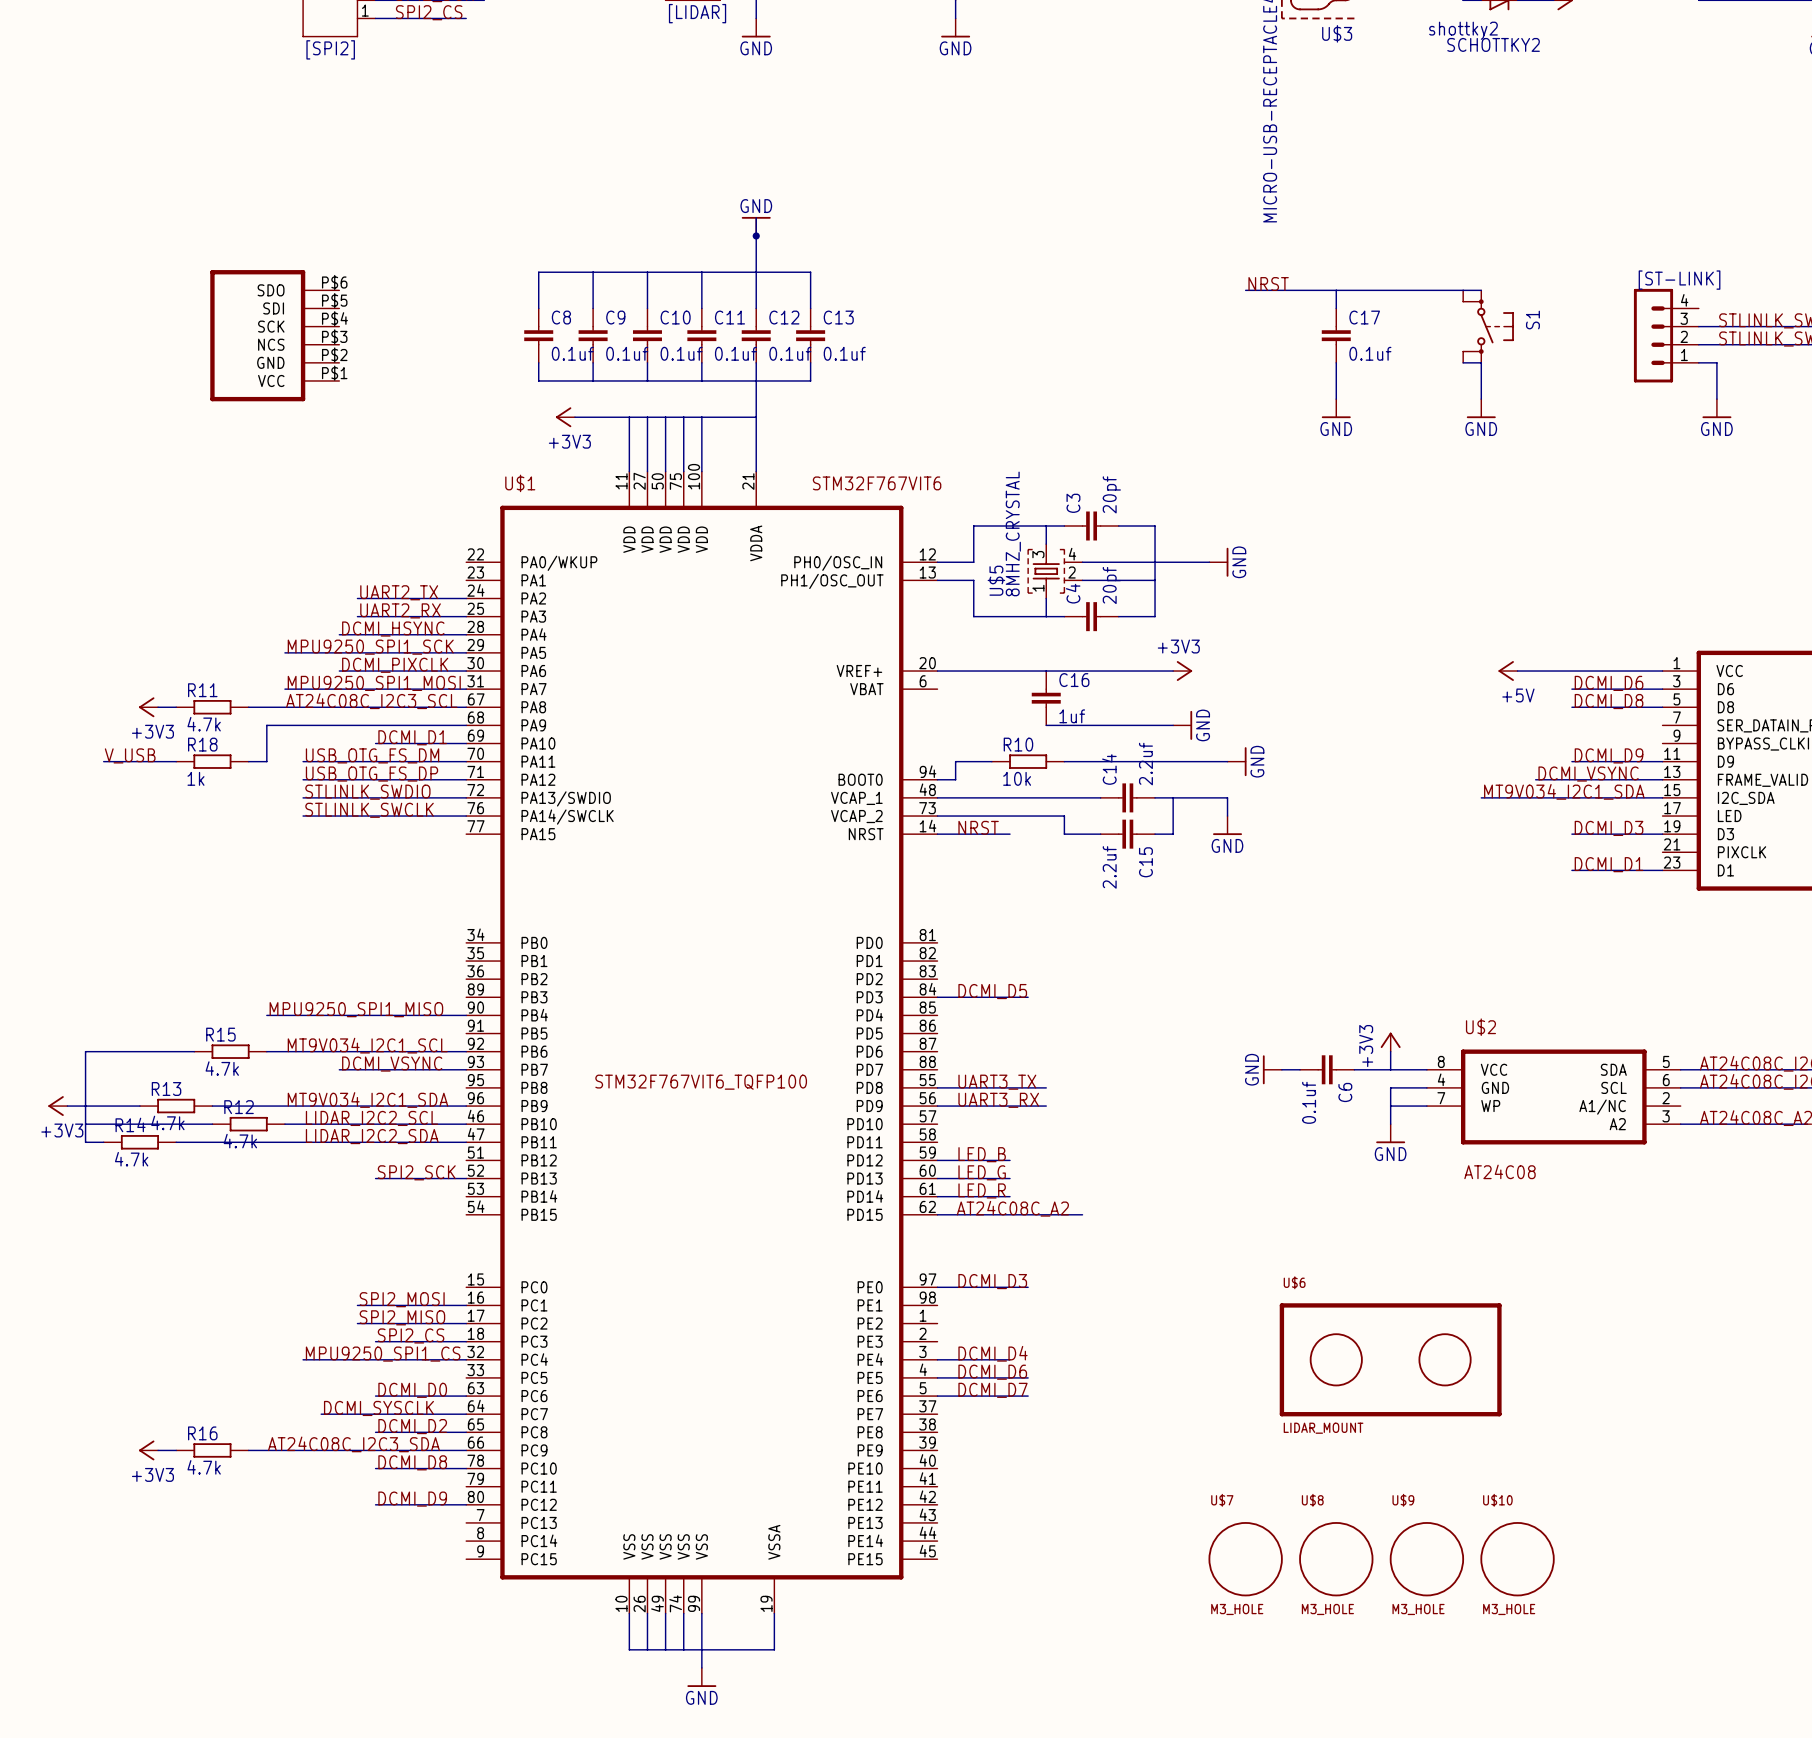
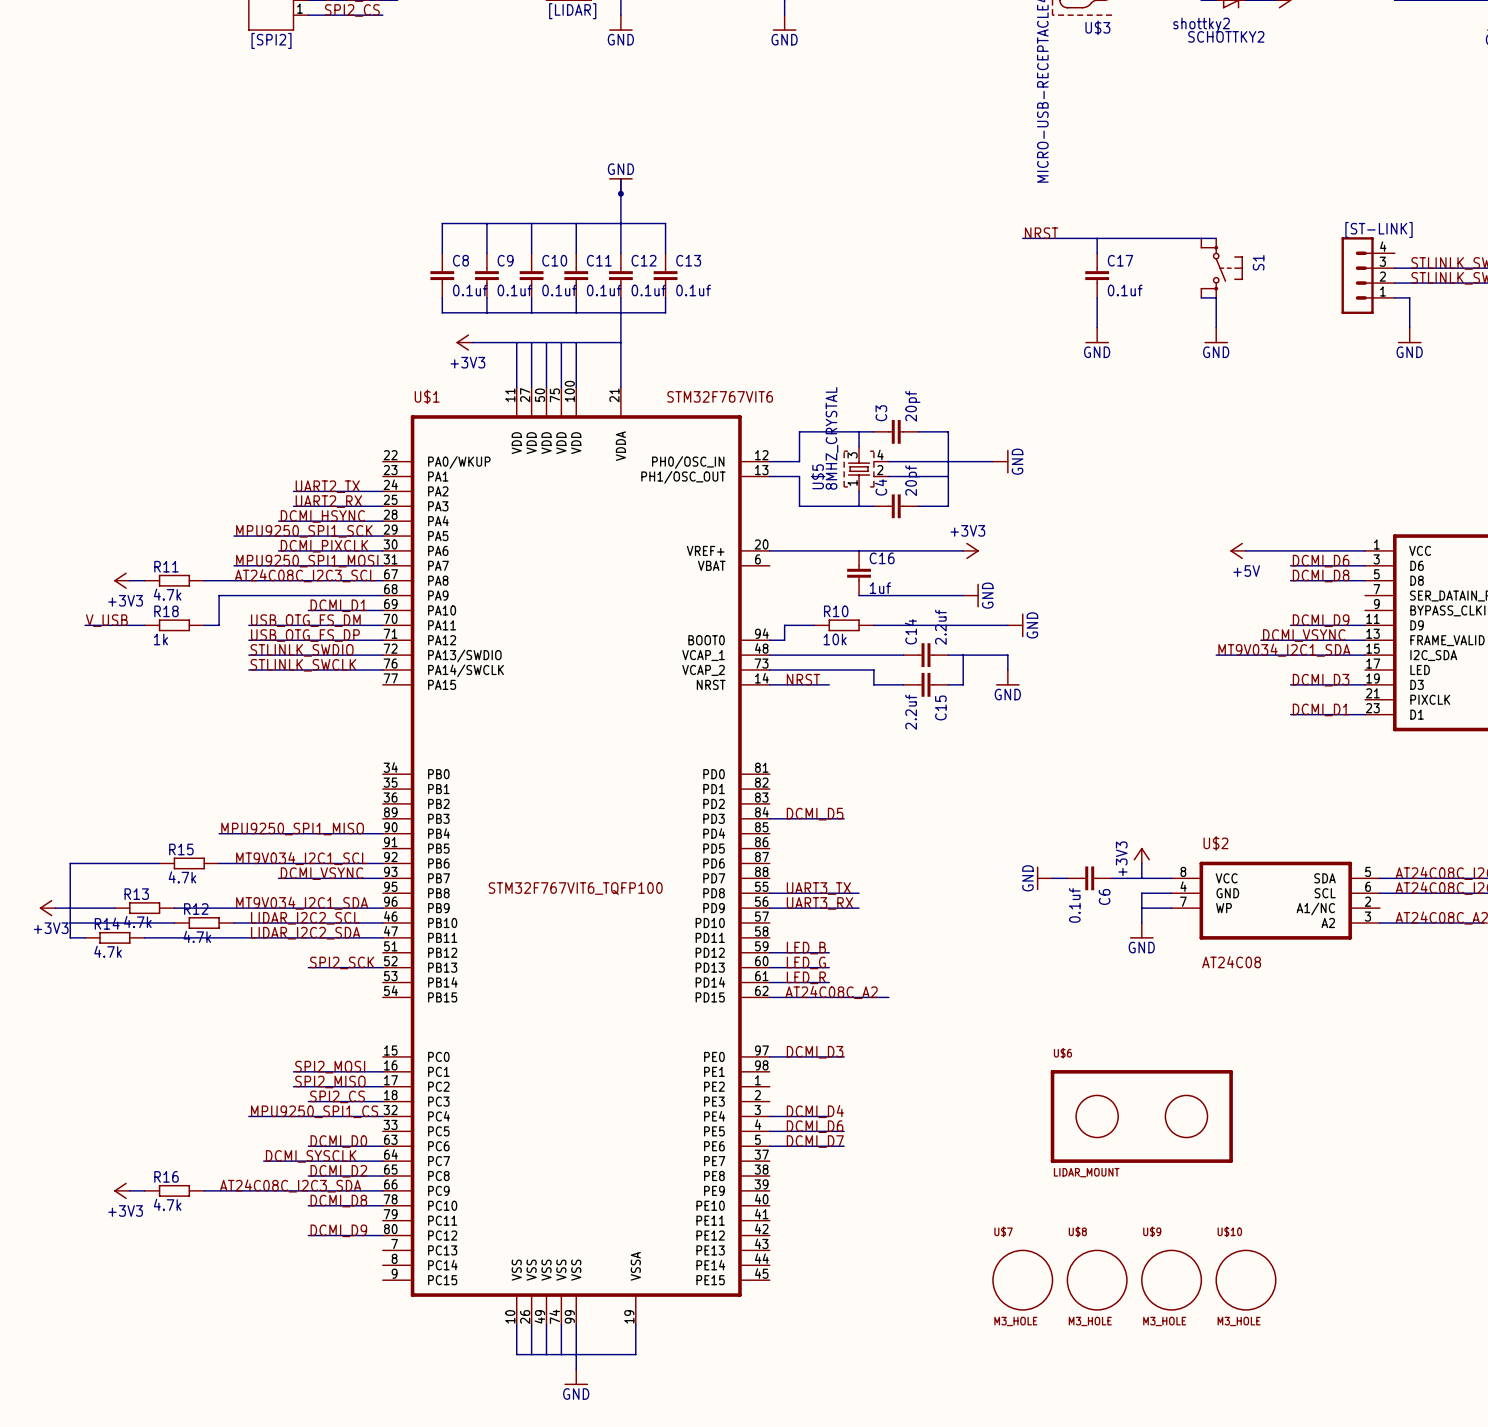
part: (274, 335) -> none

